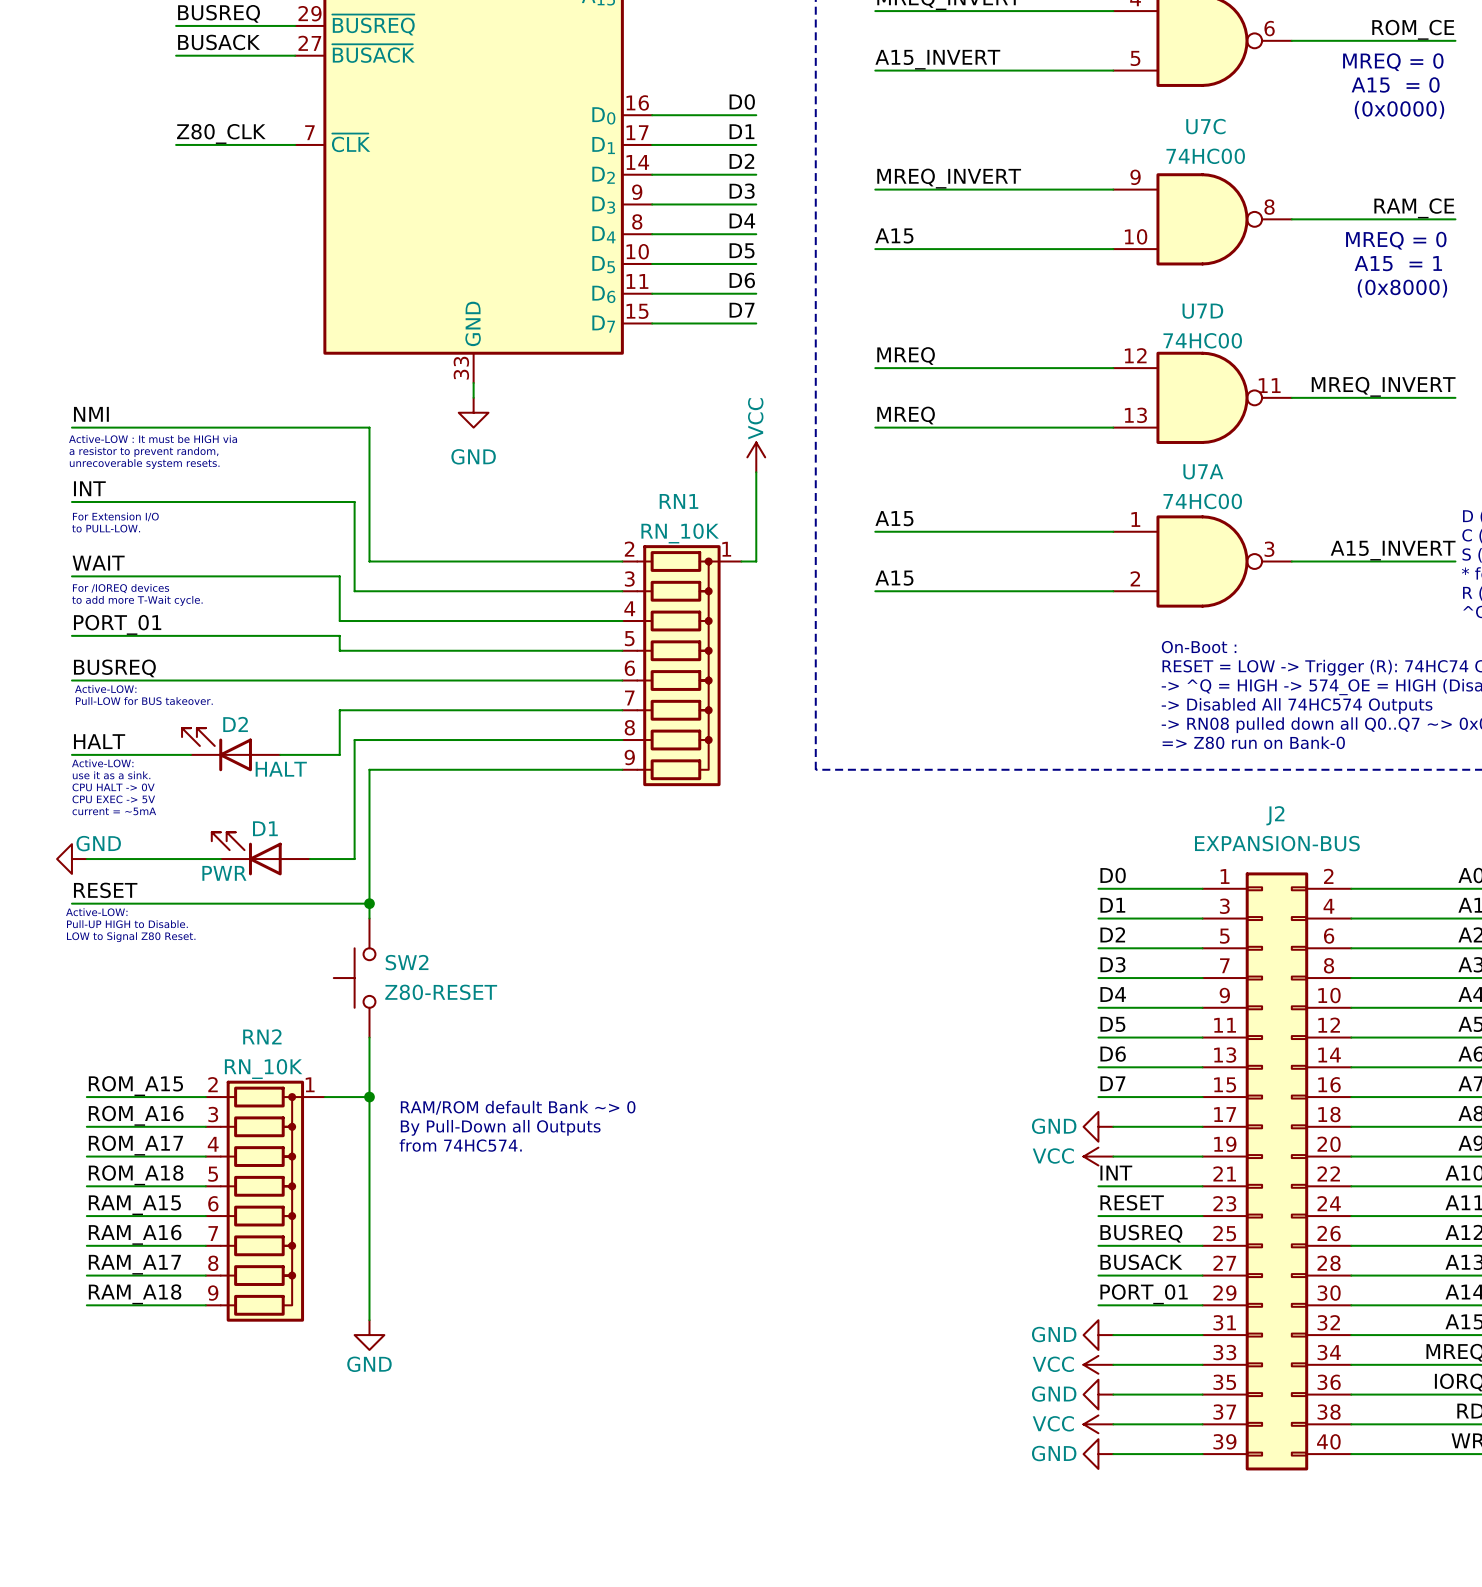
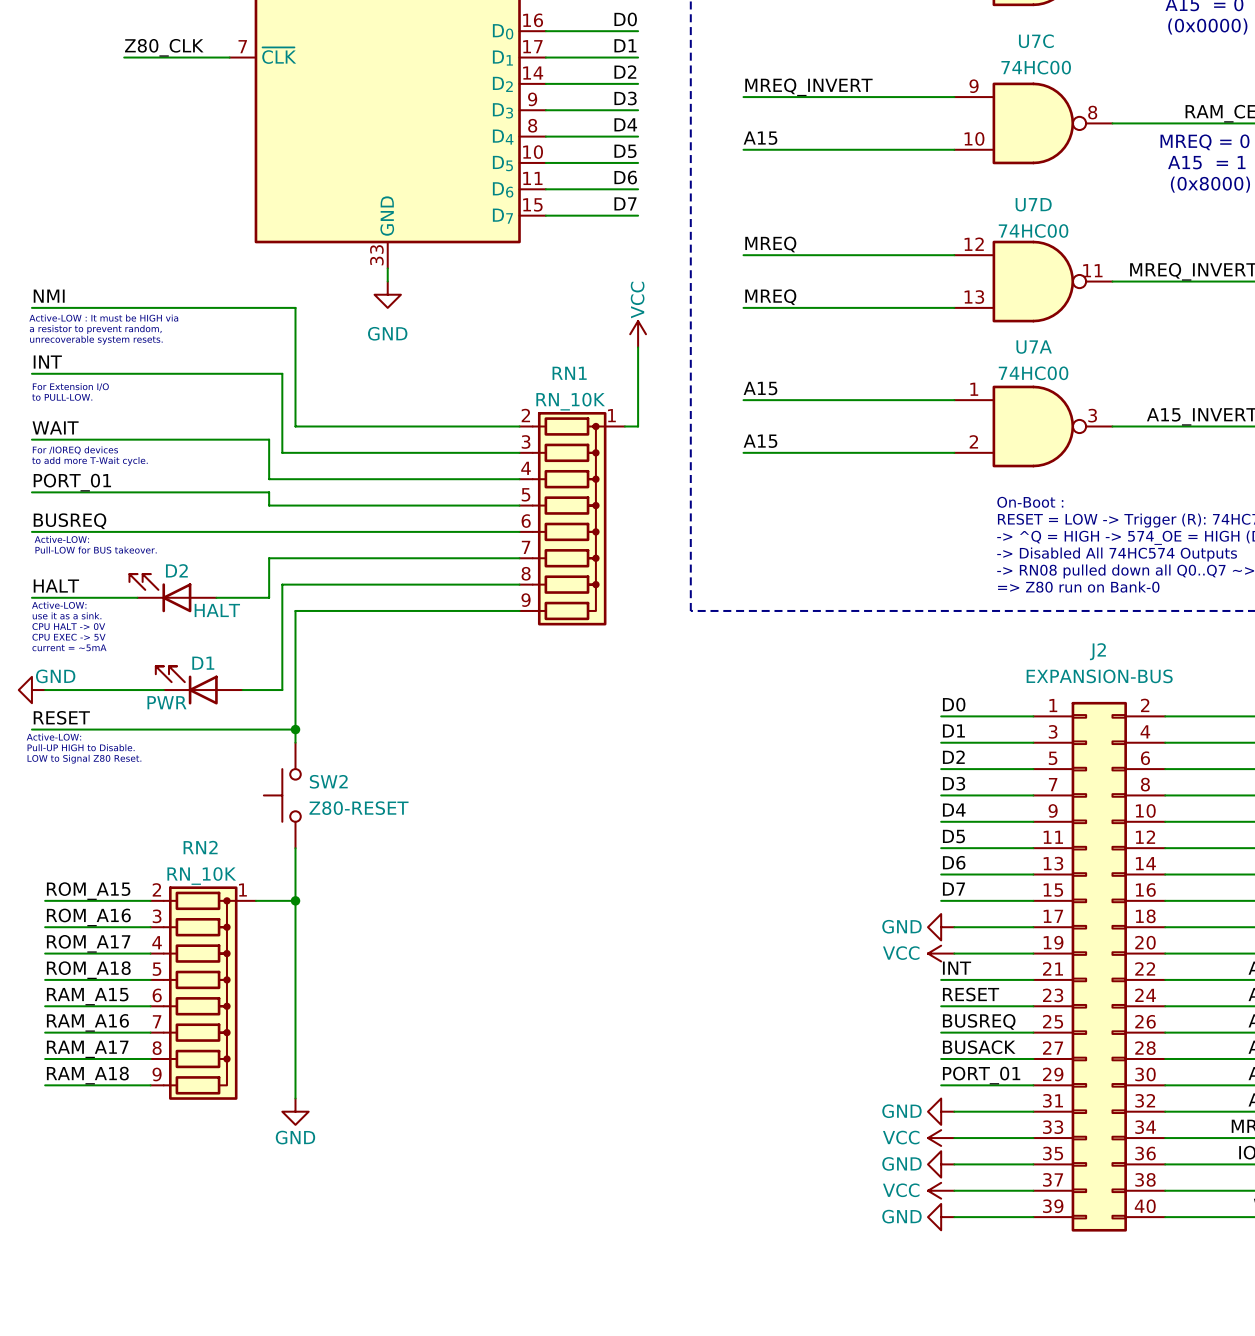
text: RAM/ROM default Bank ~> 0 (518, 1107) -> none
text: By Pull-Down all Outputs (500, 1127) -> none
text: from 74HC574. (460, 1145) -> none

